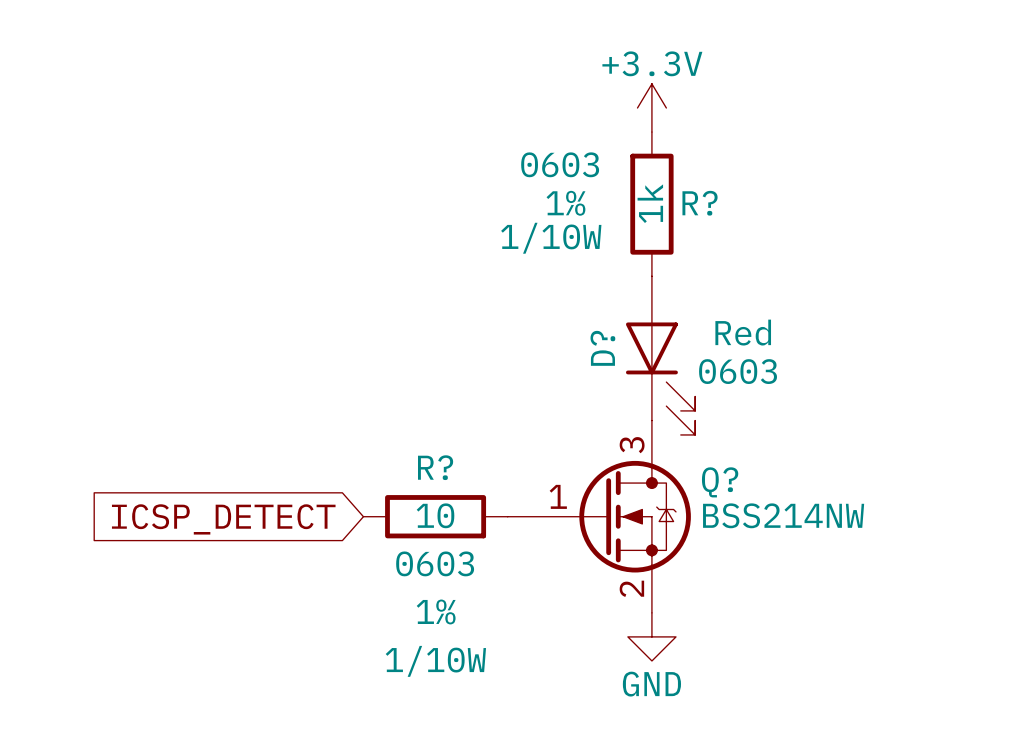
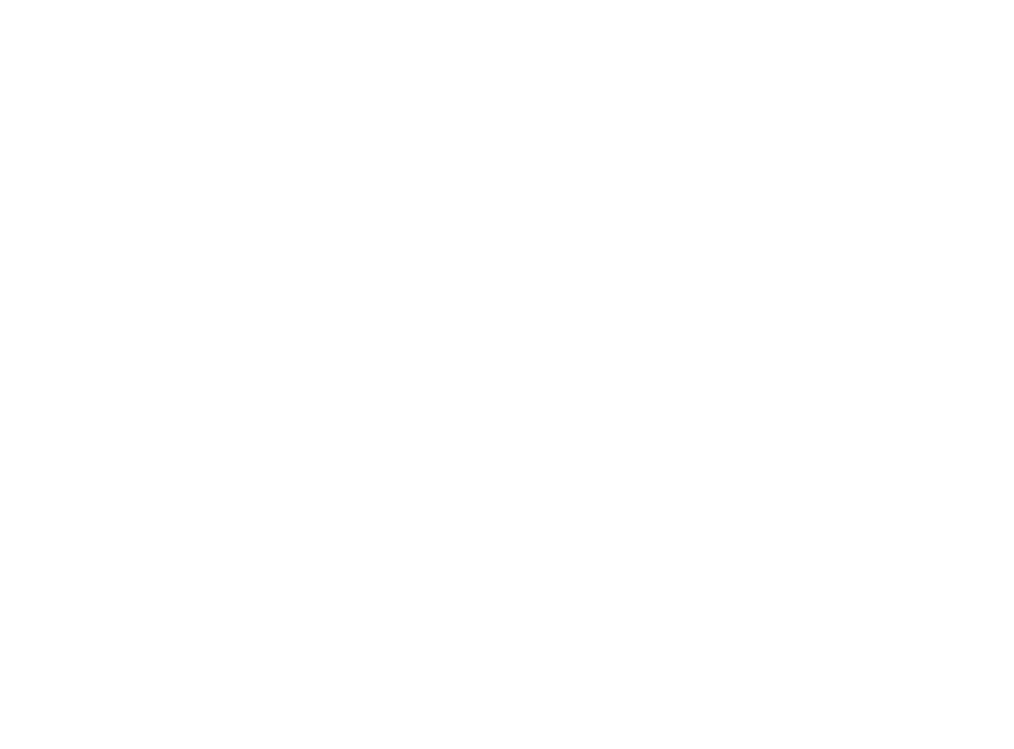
power symbol: +3.3V (651, 108) -> none
R?: 1k (651, 204) -> none
D?: Red (660, 355) -> none
R?: 10 (435, 516) -> none
Q?: BSS214NW (599, 516) -> none
global label: ICSP_DETECT (223, 519) -> none
power symbol: GND (651, 636) -> none

